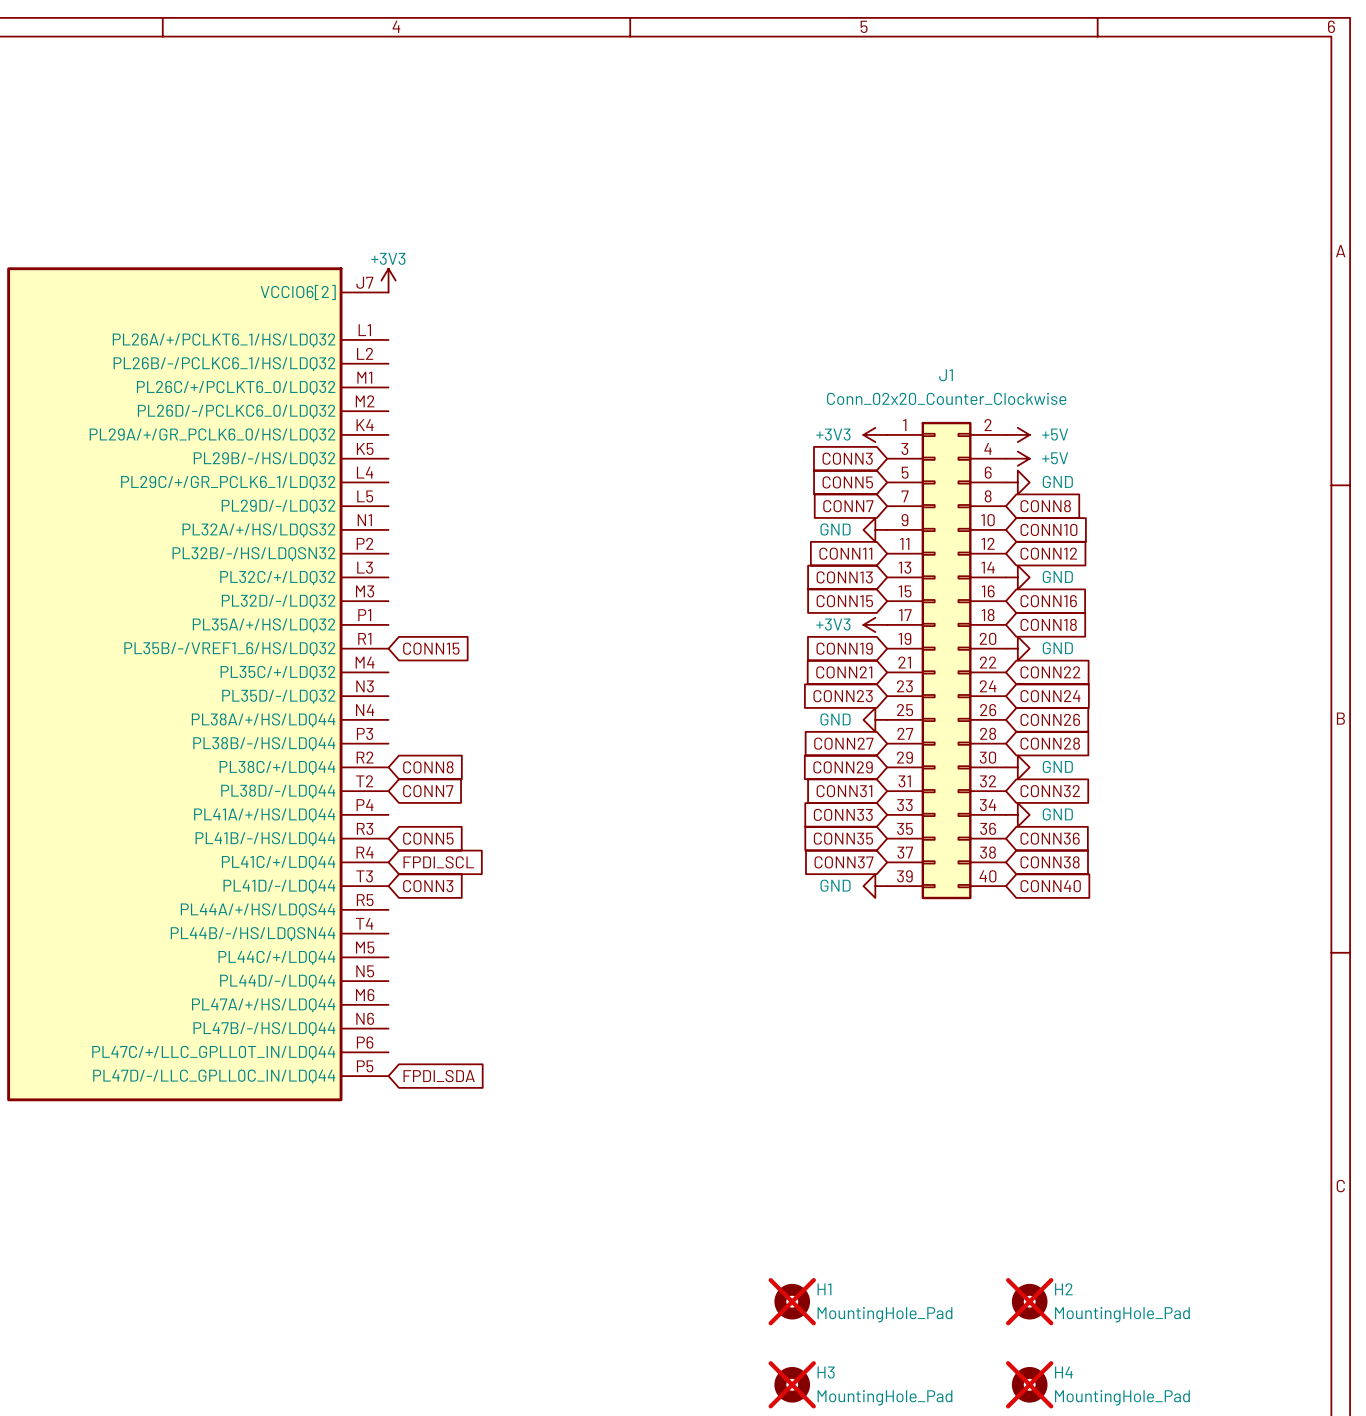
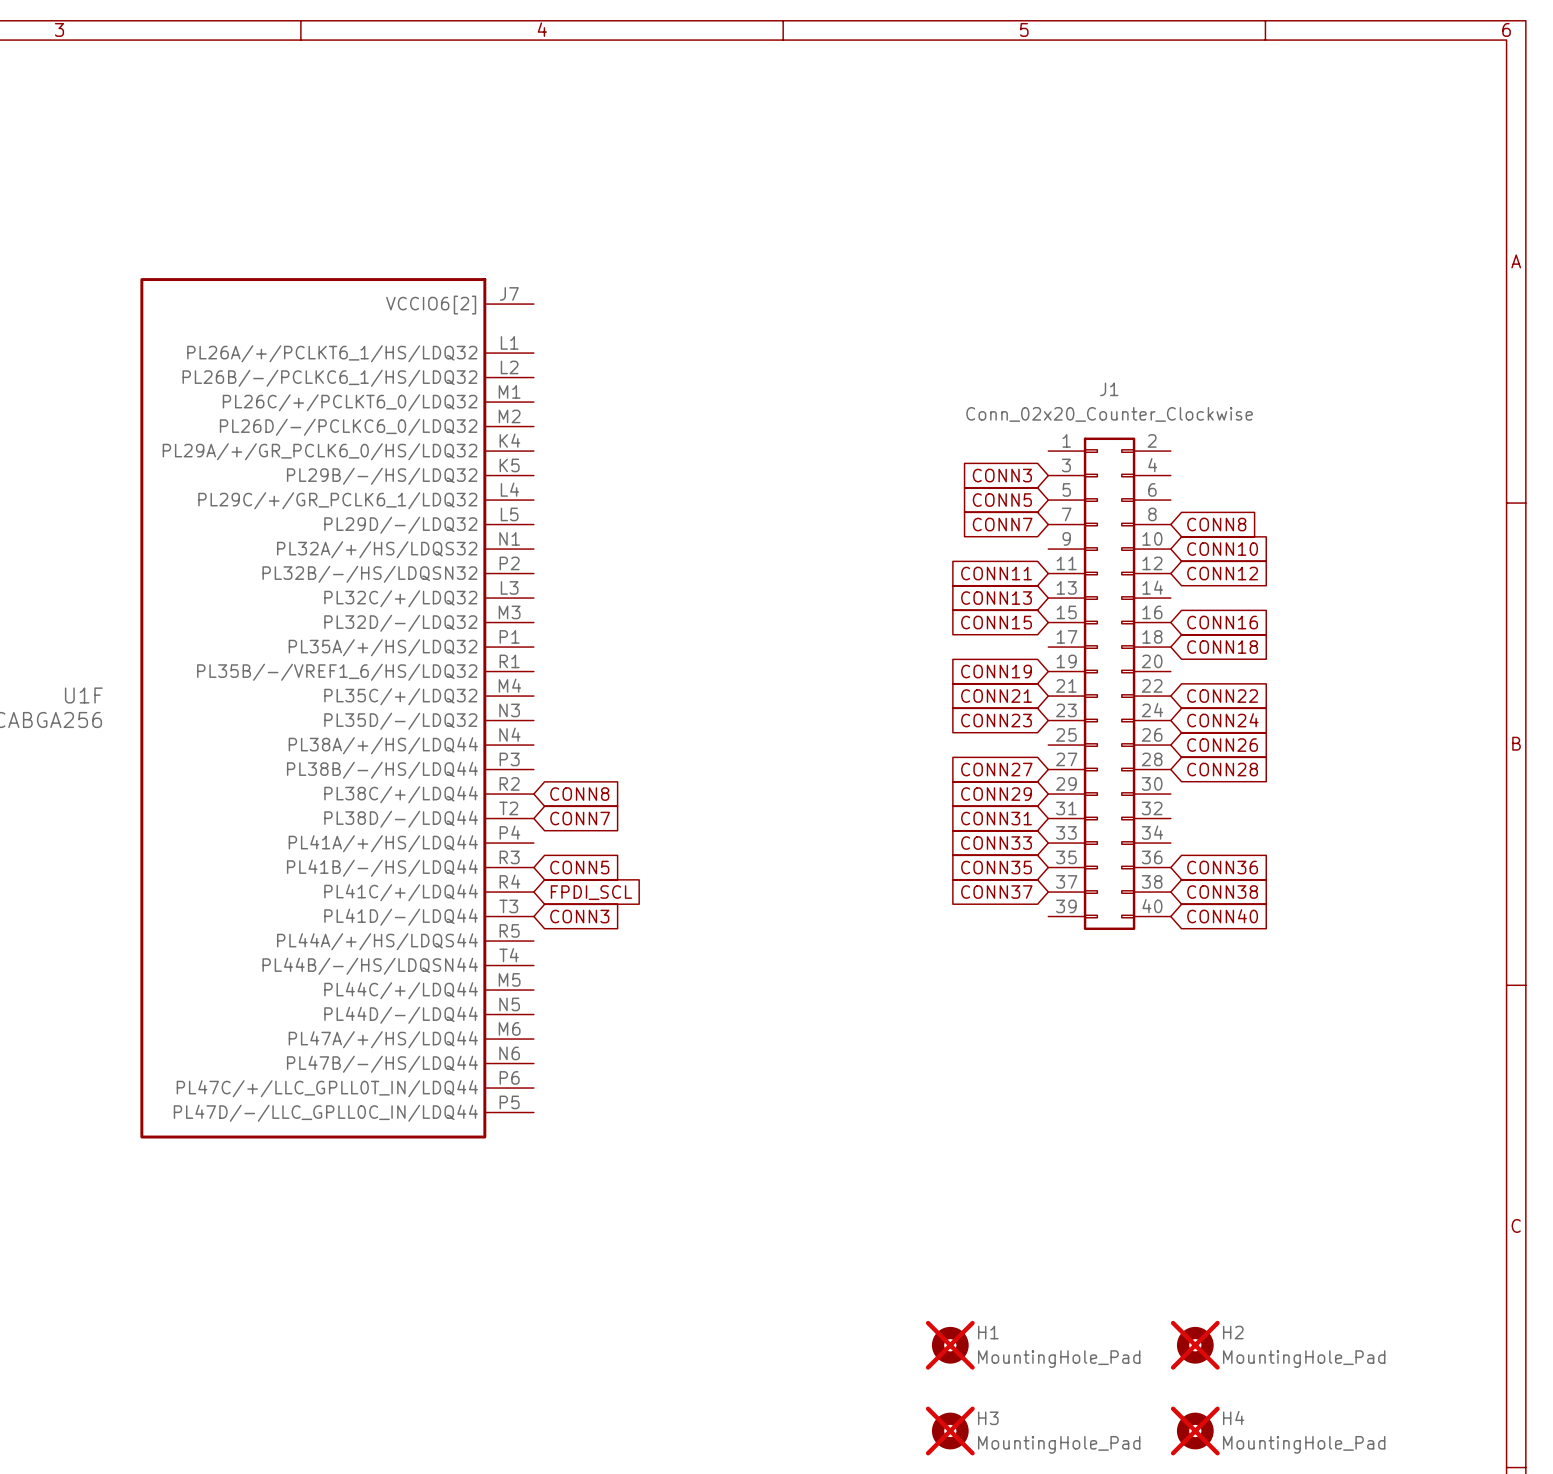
power symbol: +3V3 (388, 280) -> none
power symbol: +3V3 (875, 434) -> none
power symbol: +5V (1017, 434) -> none
power symbol: +5V (1017, 458) -> none
power symbol: GND (1017, 482) -> none
power symbol: GND (875, 529) -> none
power symbol: GND (1017, 577) -> none
power symbol: +3V3 (875, 624) -> none
global label: CONN15 (431, 648) -> none
power symbol: GND (1017, 648) -> none
power symbol: GND (875, 719) -> none
power symbol: GND (1017, 767) -> none
global label: CONN32 (1050, 791) -> none
power symbol: GND (1017, 814) -> none
power symbol: GND (875, 886) -> none
global label: FPDI_SDA (439, 1076) -> none

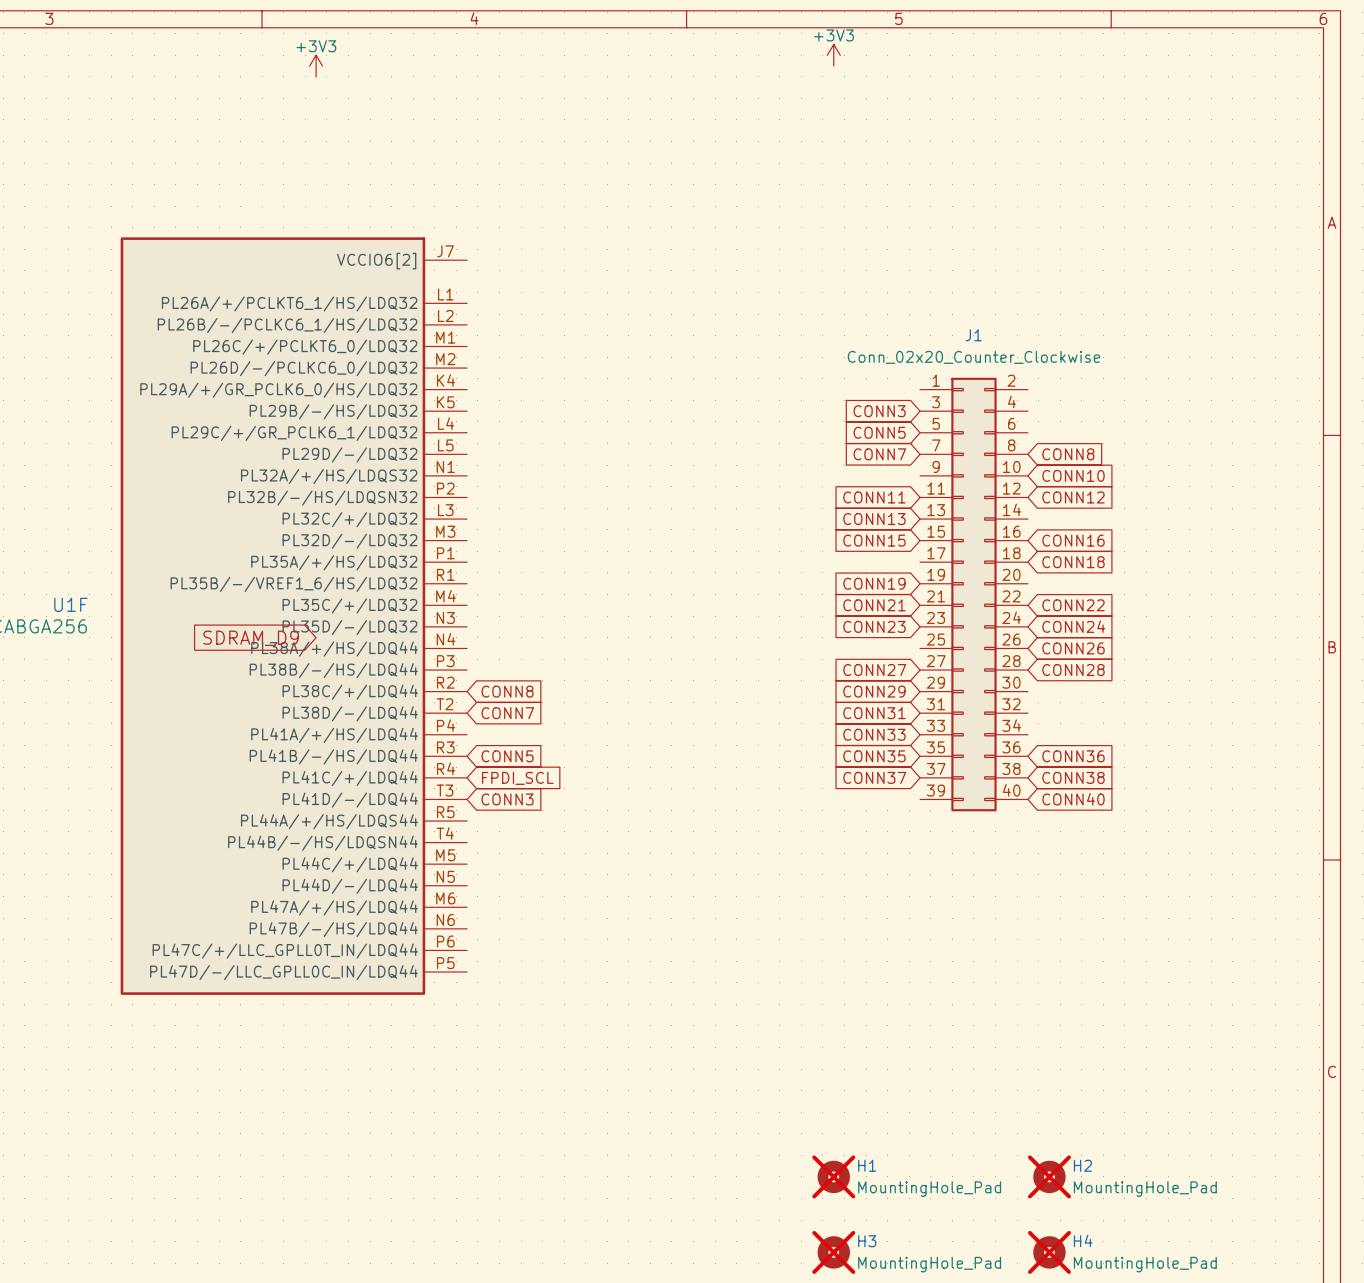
power symbol: none -> +3V3 (833, 55)
power symbol: none -> +3V3 (316, 66)
global label: none -> SDRAM_D9 (251, 638)

